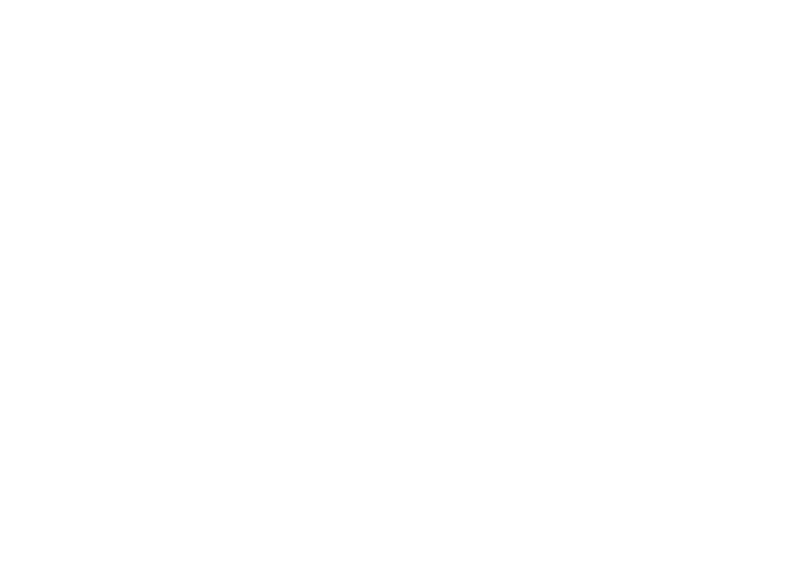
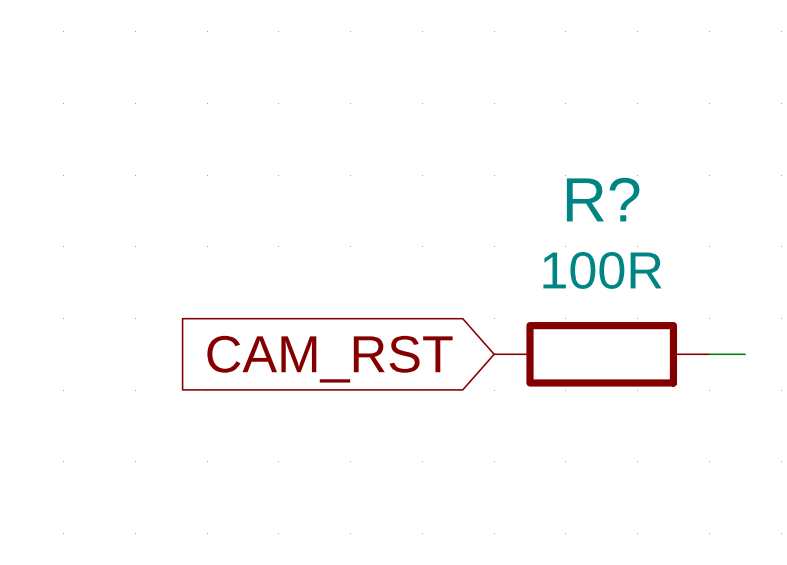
R?: none -> (601, 354)
wire: none -> (709, 354) (745, 354)
global label: none -> CAM_RST (330, 359)

